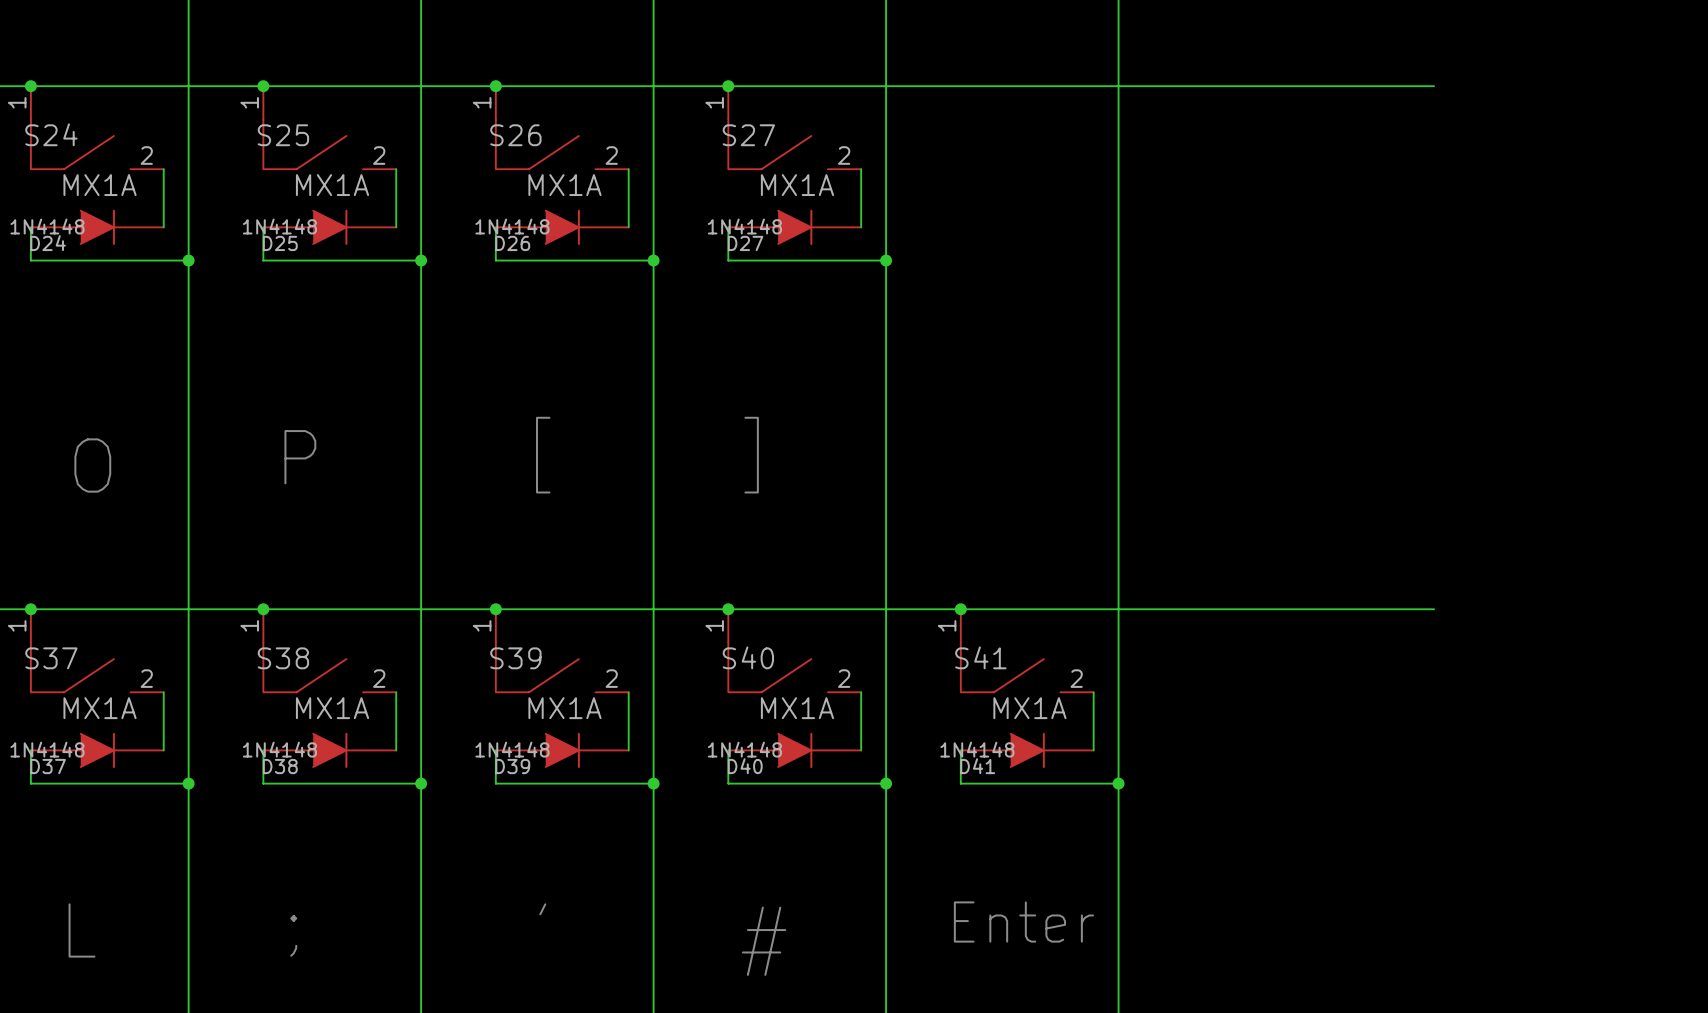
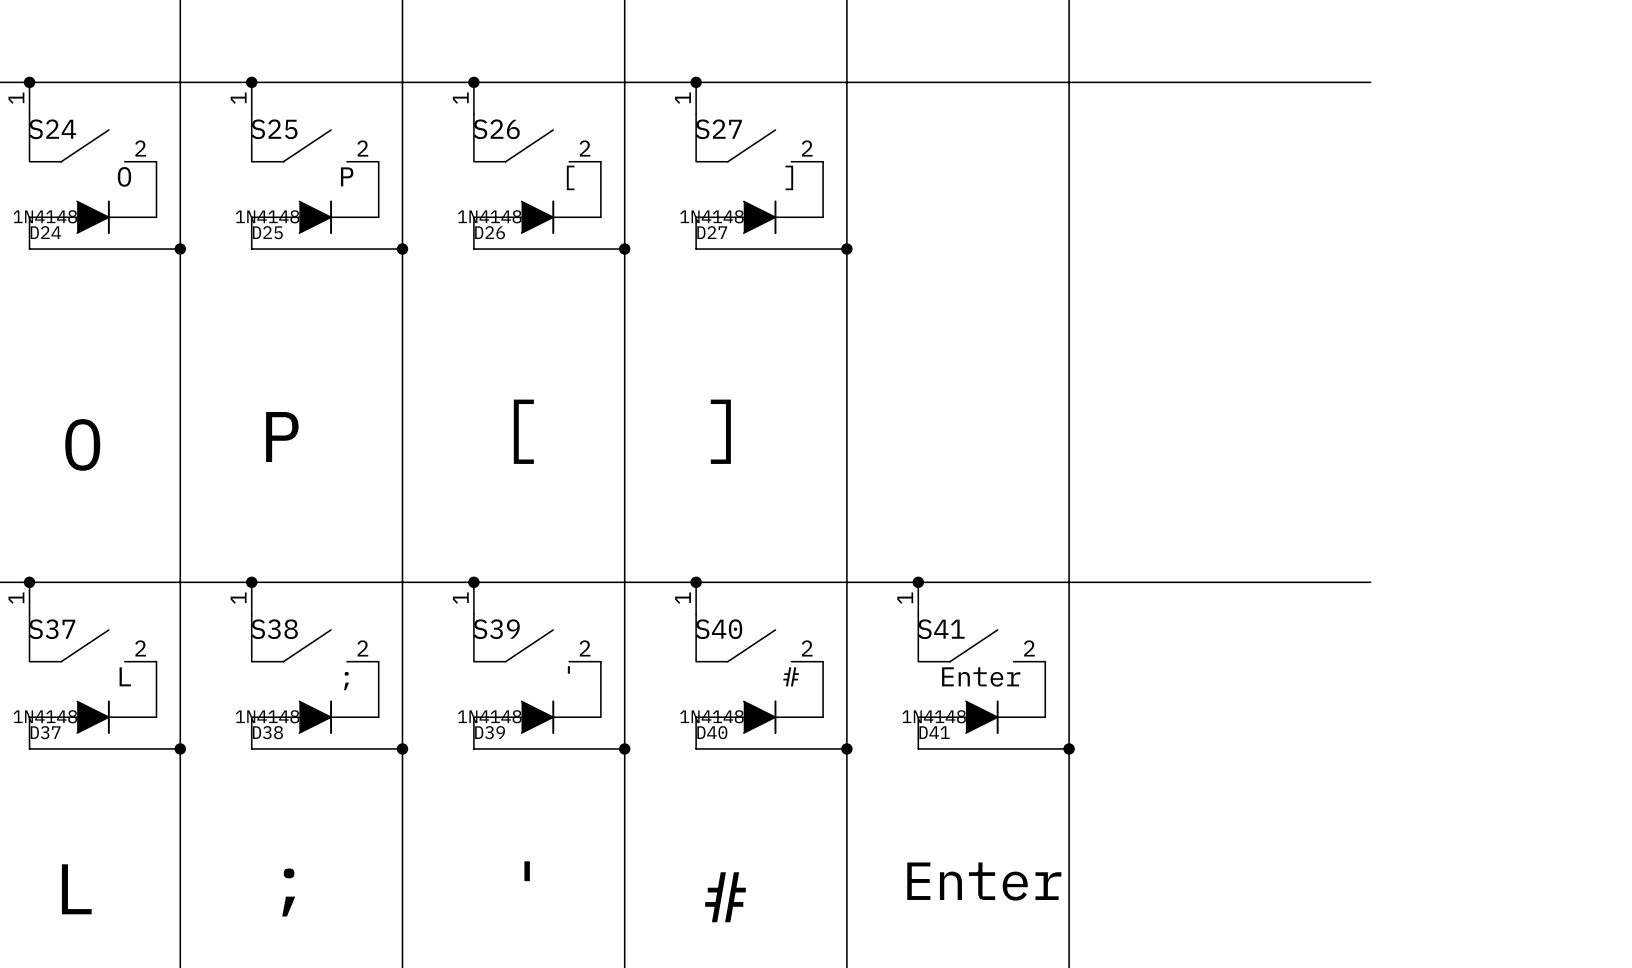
S24 value: MX1A (100, 185) -> O (124, 176)
S25 value: MX1A (332, 185) -> P (347, 176)
S26 value: MX1A (564, 185) -> [ (570, 177)
S27 value: MX1A (797, 185) -> ] (789, 177)
S37 value: MX1A (100, 708) -> L (125, 676)
S38 value: MX1A (332, 708) -> ; (346, 681)
S39 value: MX1A (564, 708) -> ' (568, 669)
S40 value: MX1A (797, 708) -> # (791, 676)
S41 value: MX1A (1029, 708) -> Enter (981, 676)

